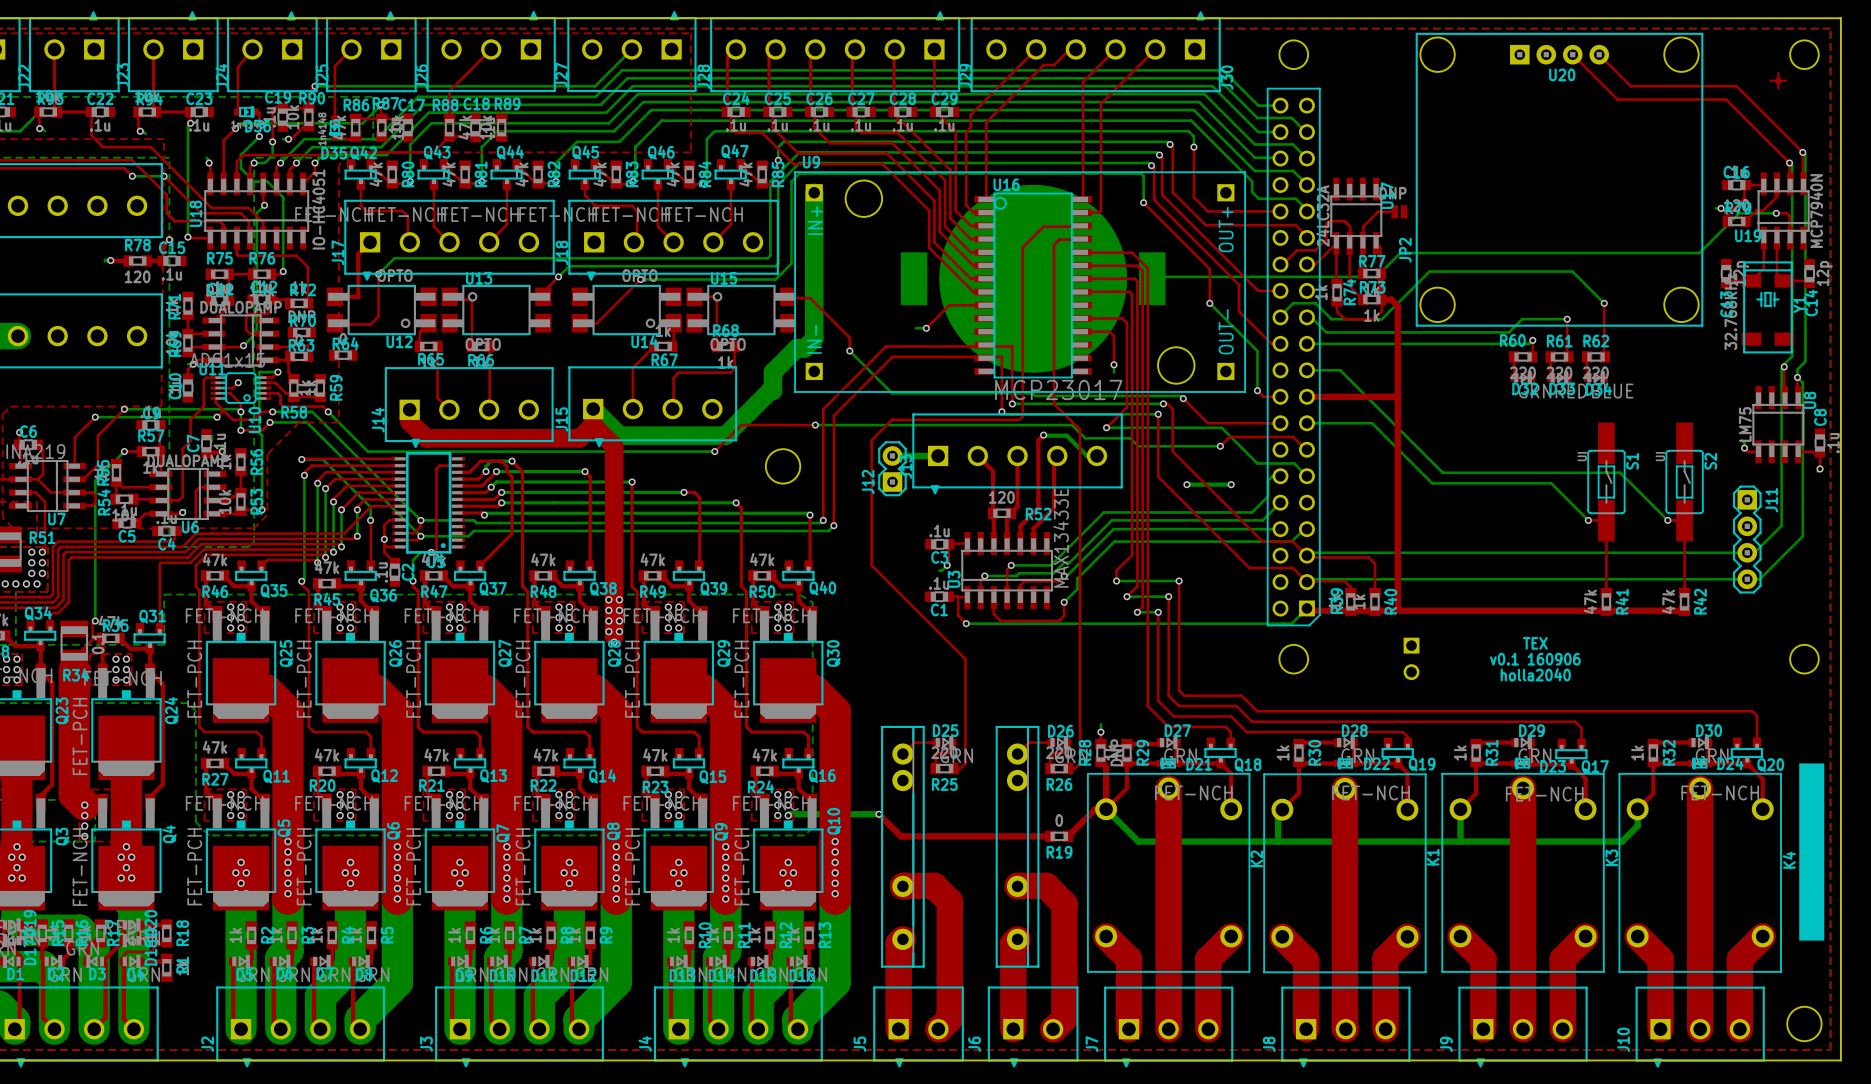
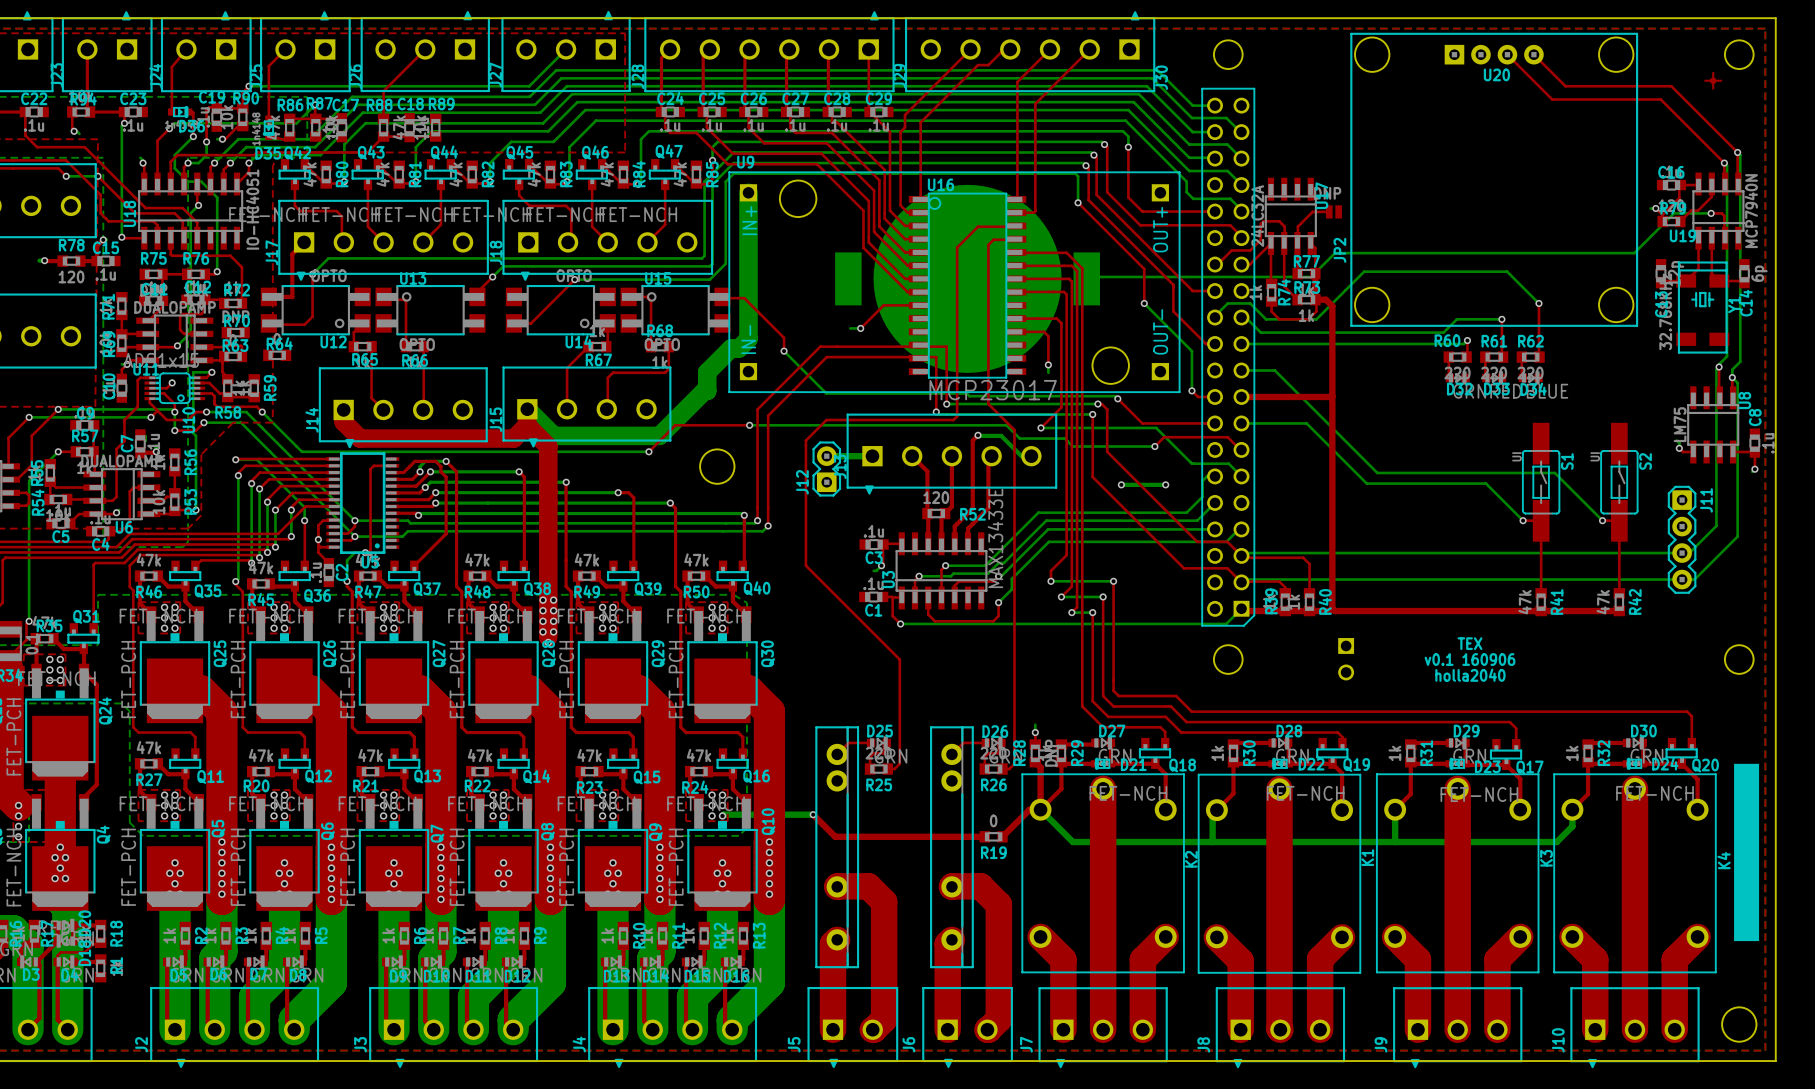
C14 value: 12p (1824, 273) -> 6p (1759, 273)

